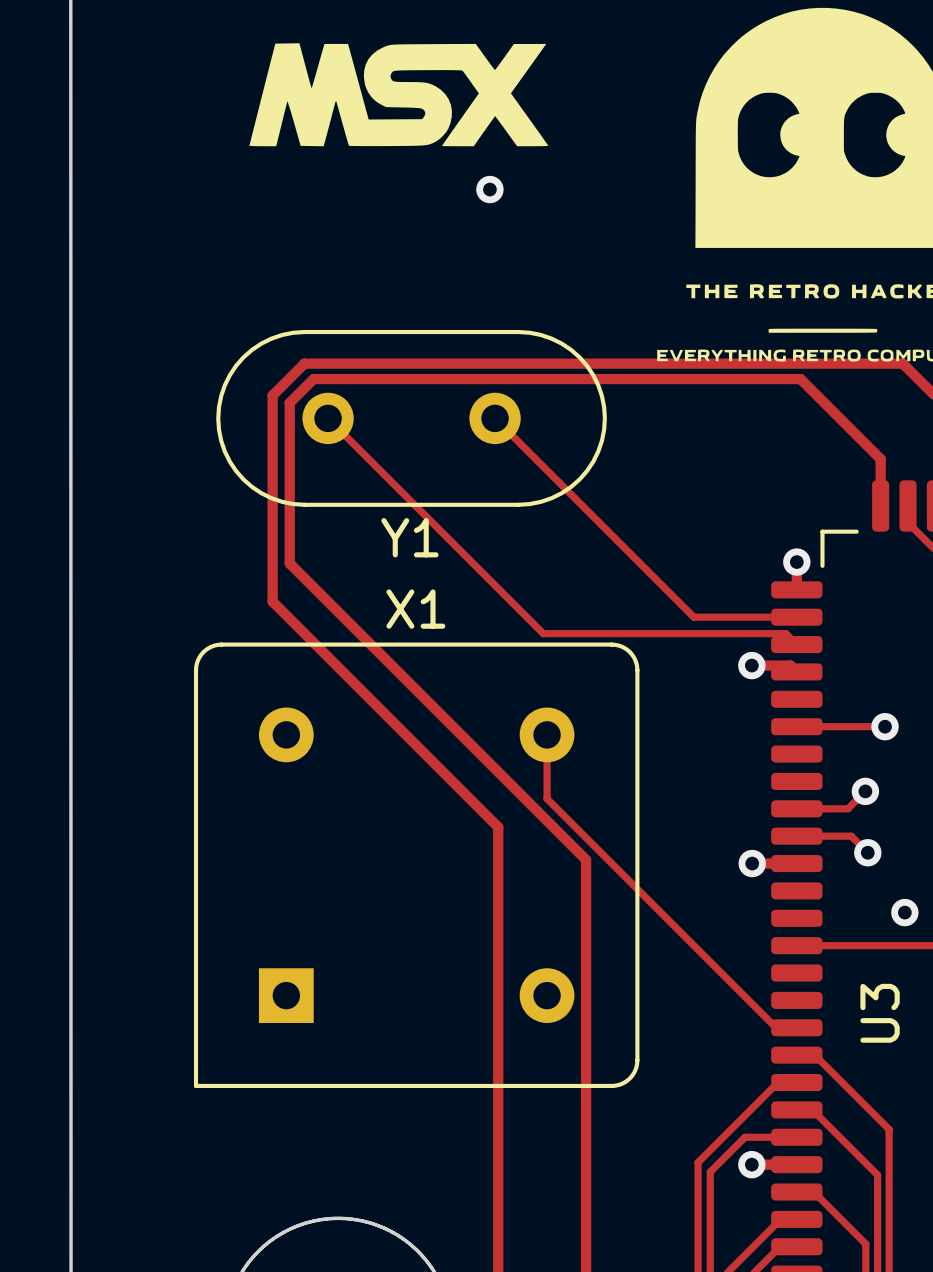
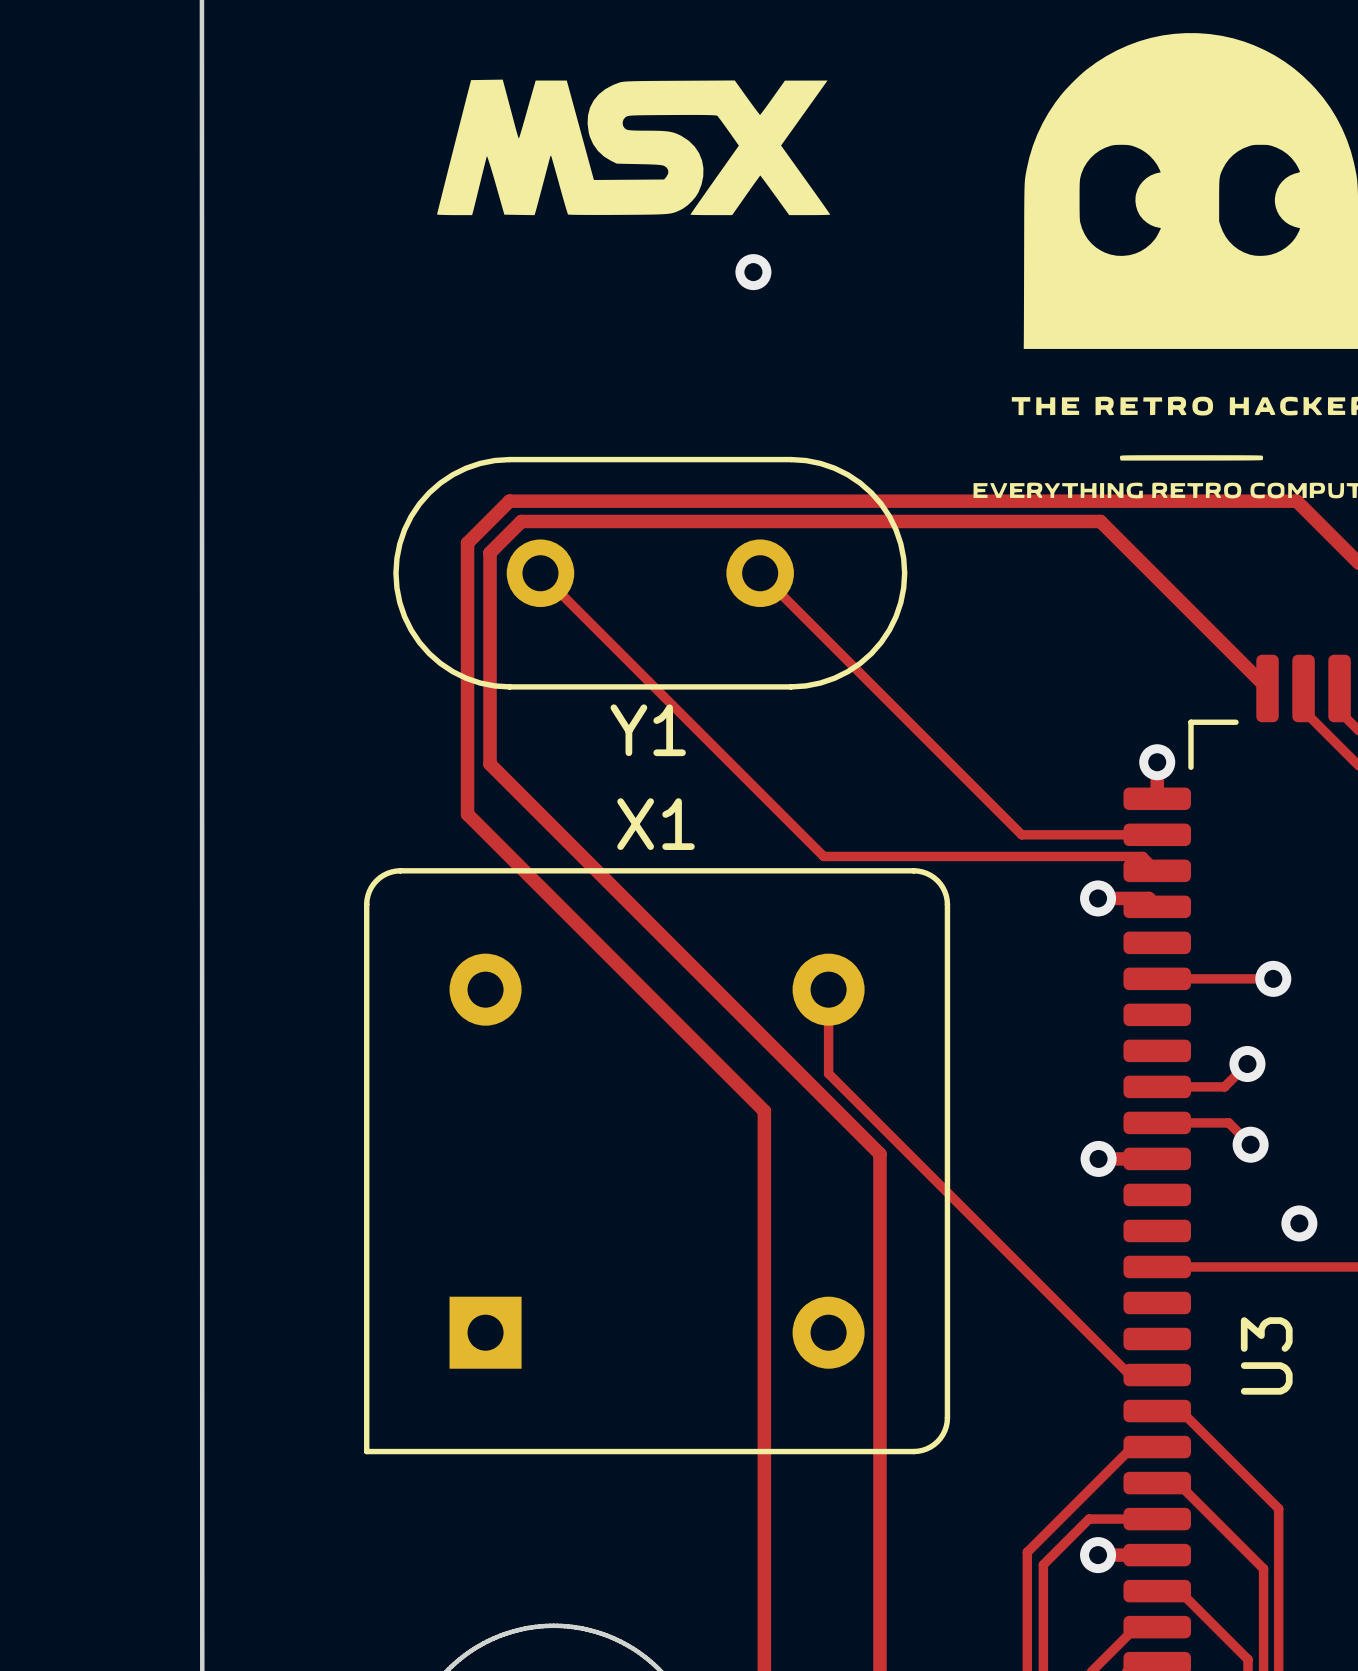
track: (753, 379) (800, 379) (880, 459) (880, 506) -> (1100, 521) (1267, 688)

